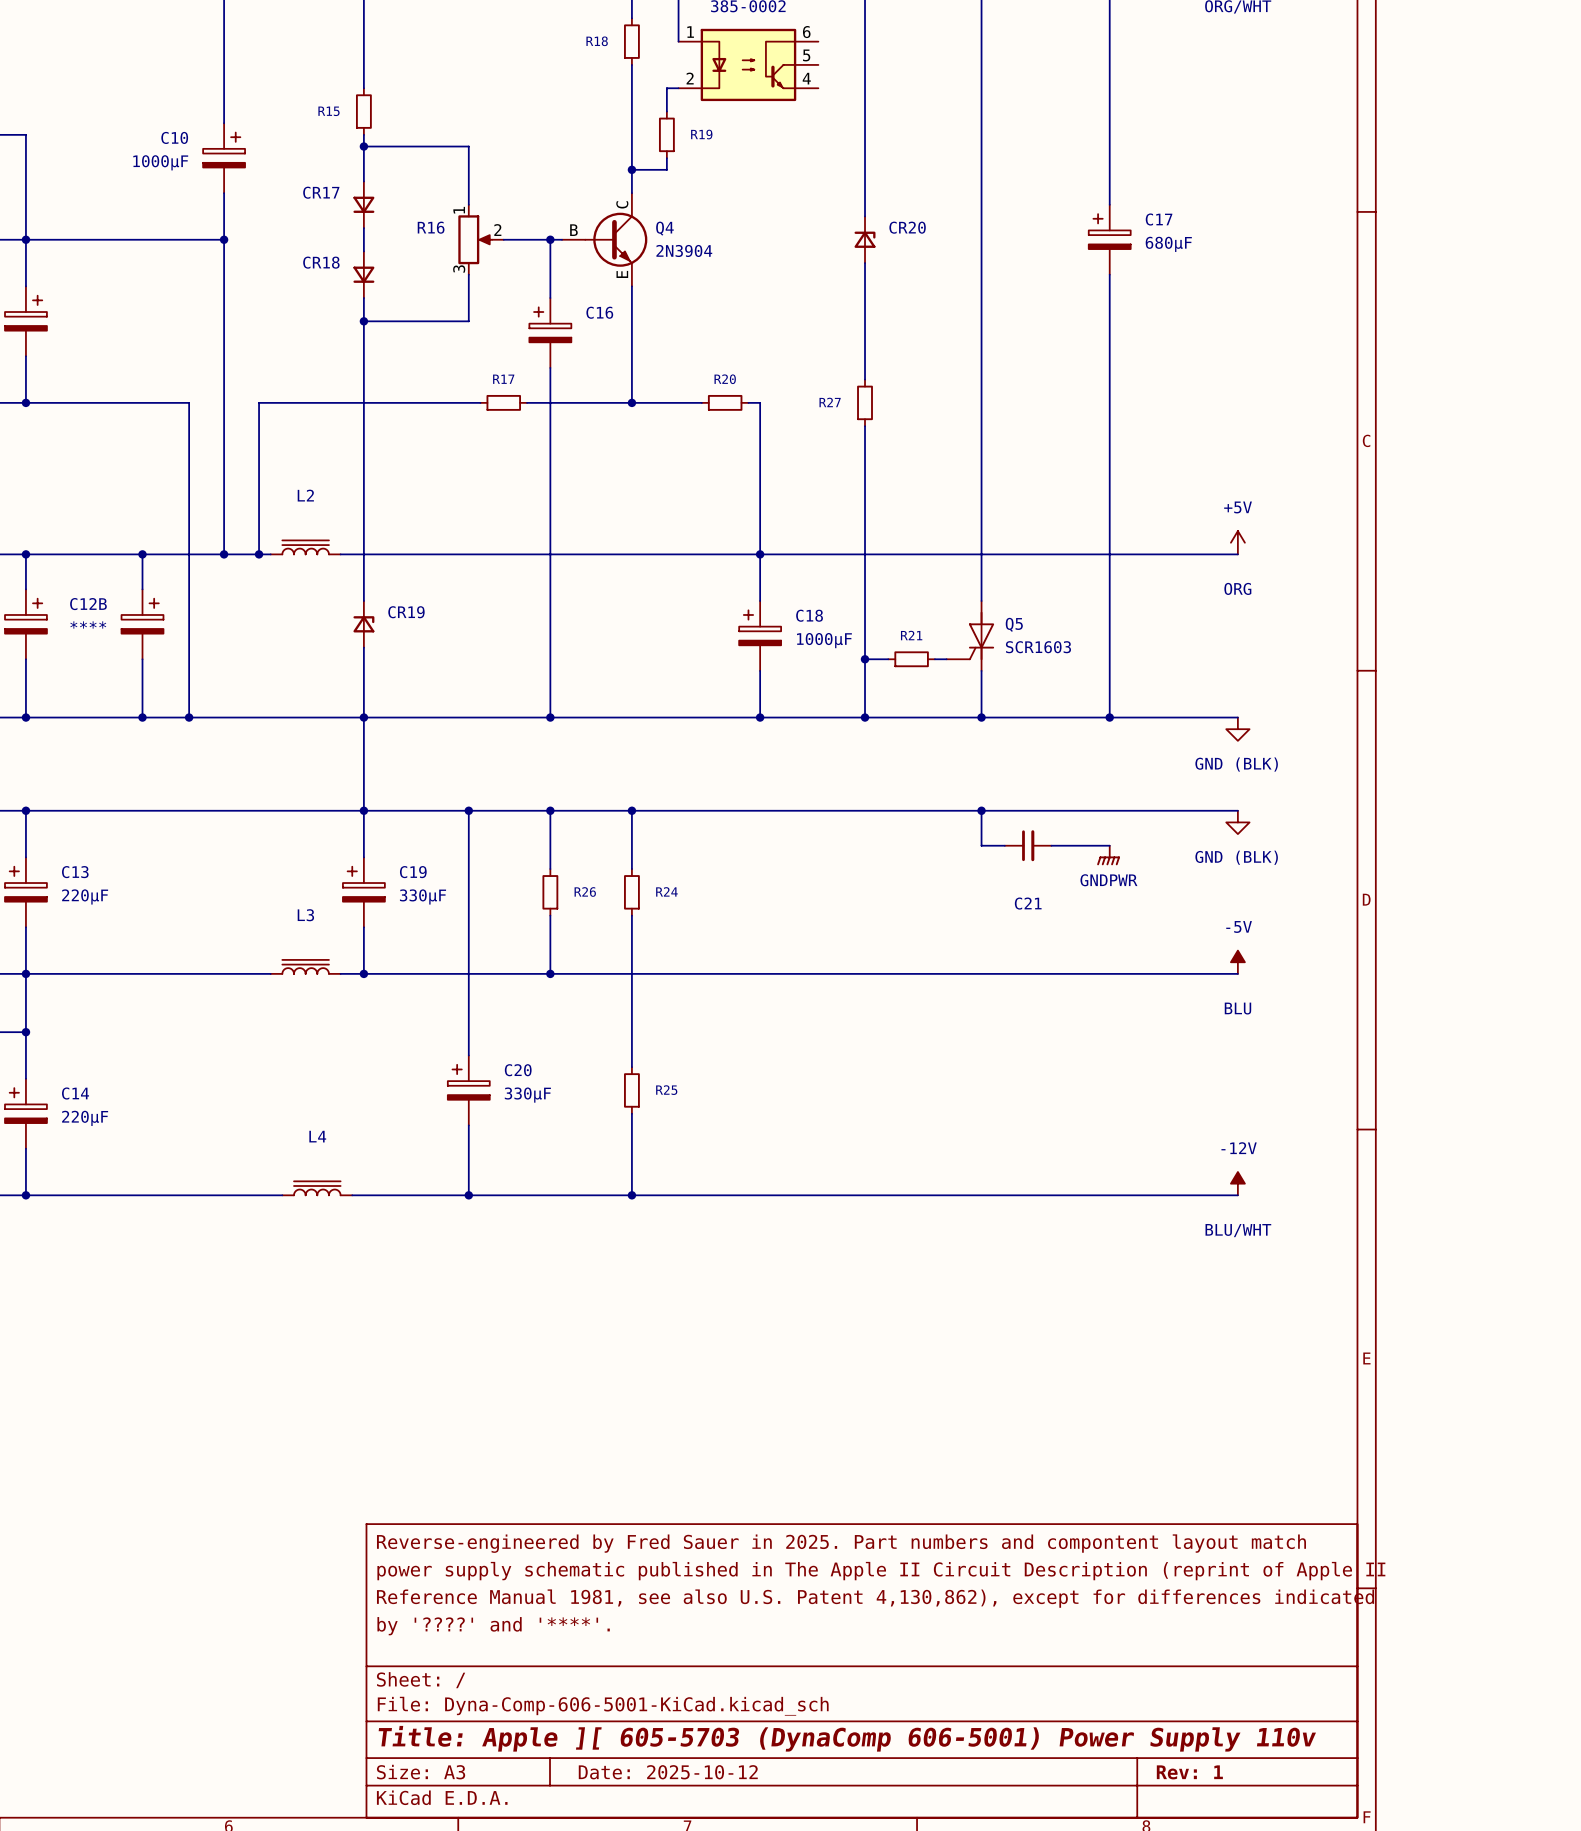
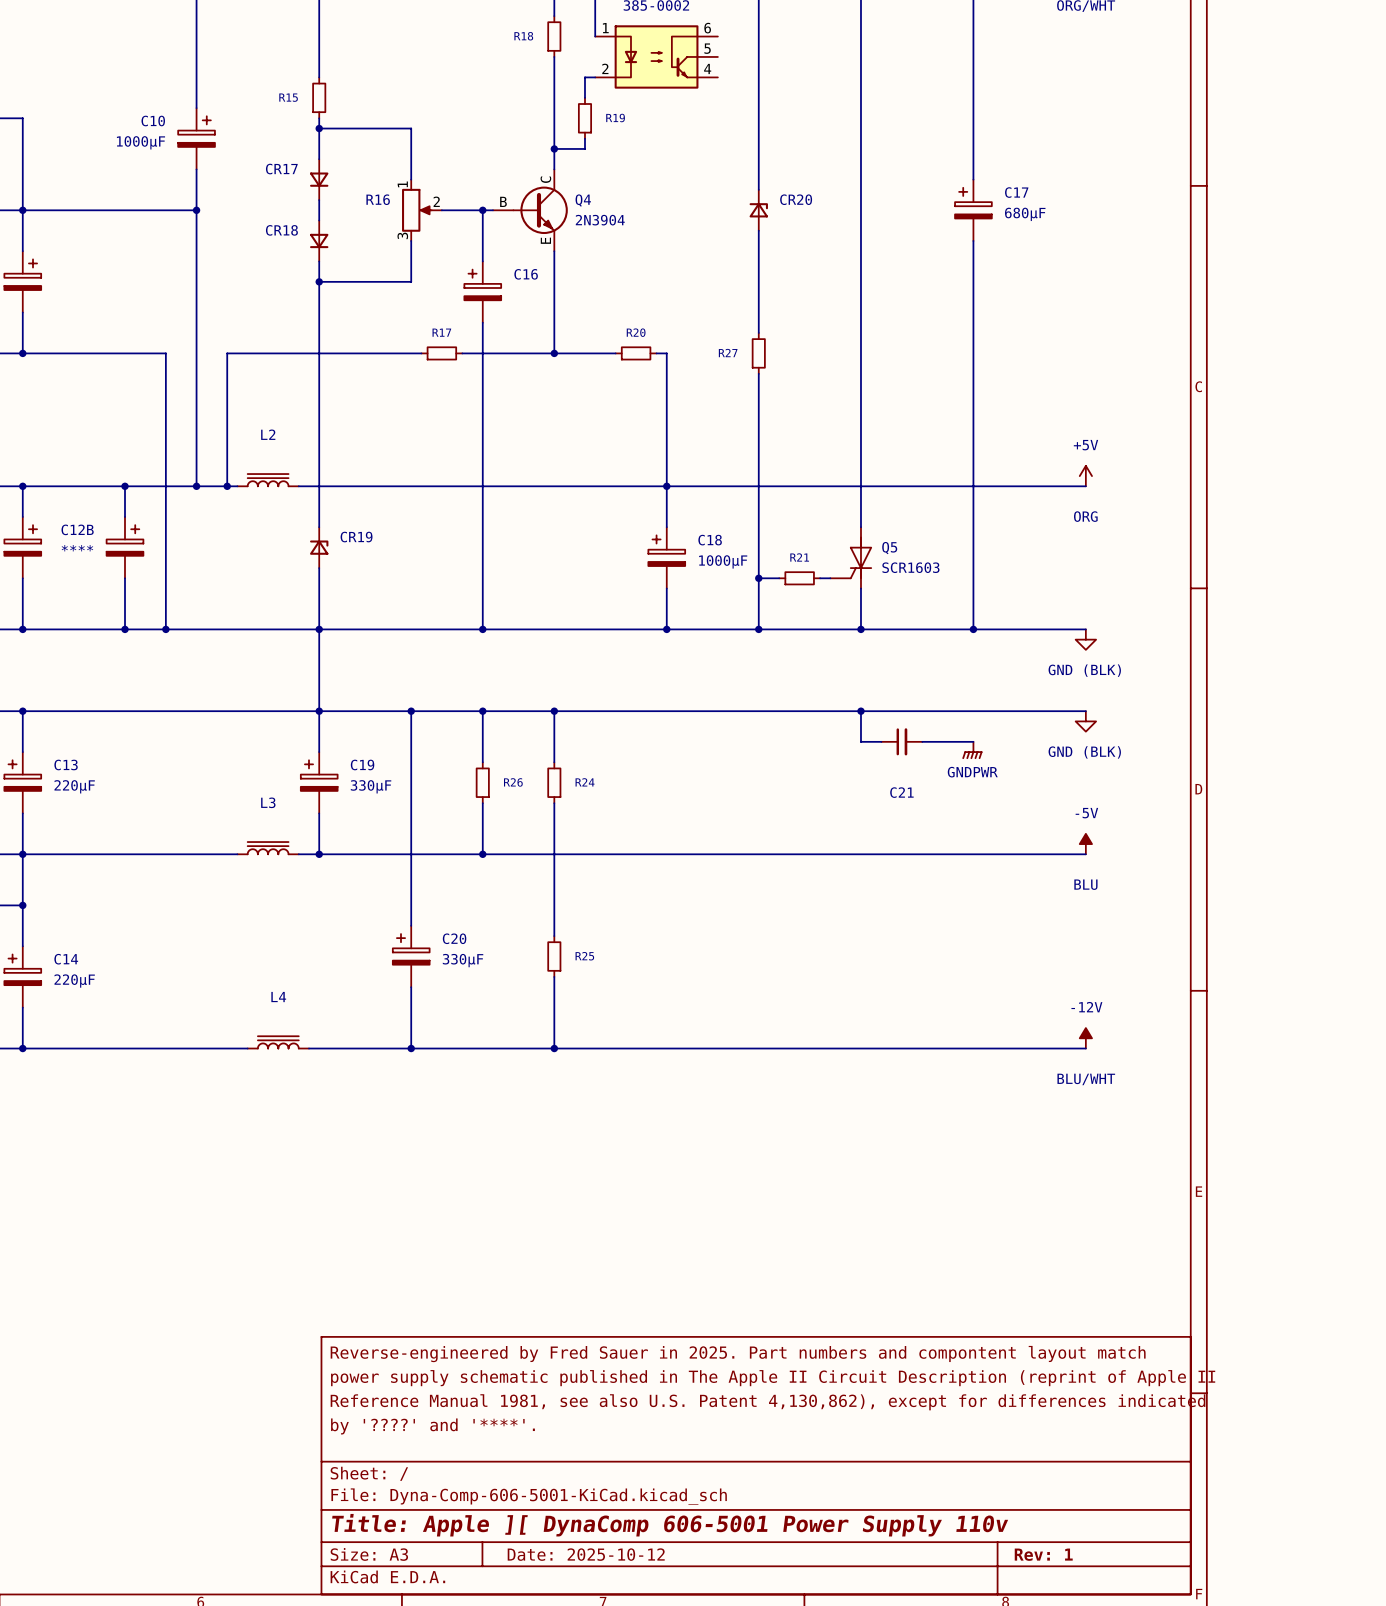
title block: Title: Apple ][ 605-5703 (DynaComp 606-5001) Power Supply 110v (847, 1738) -> Title: Apple ][ DynaComp 606-5001 Power Supply 110v (670, 1525)

